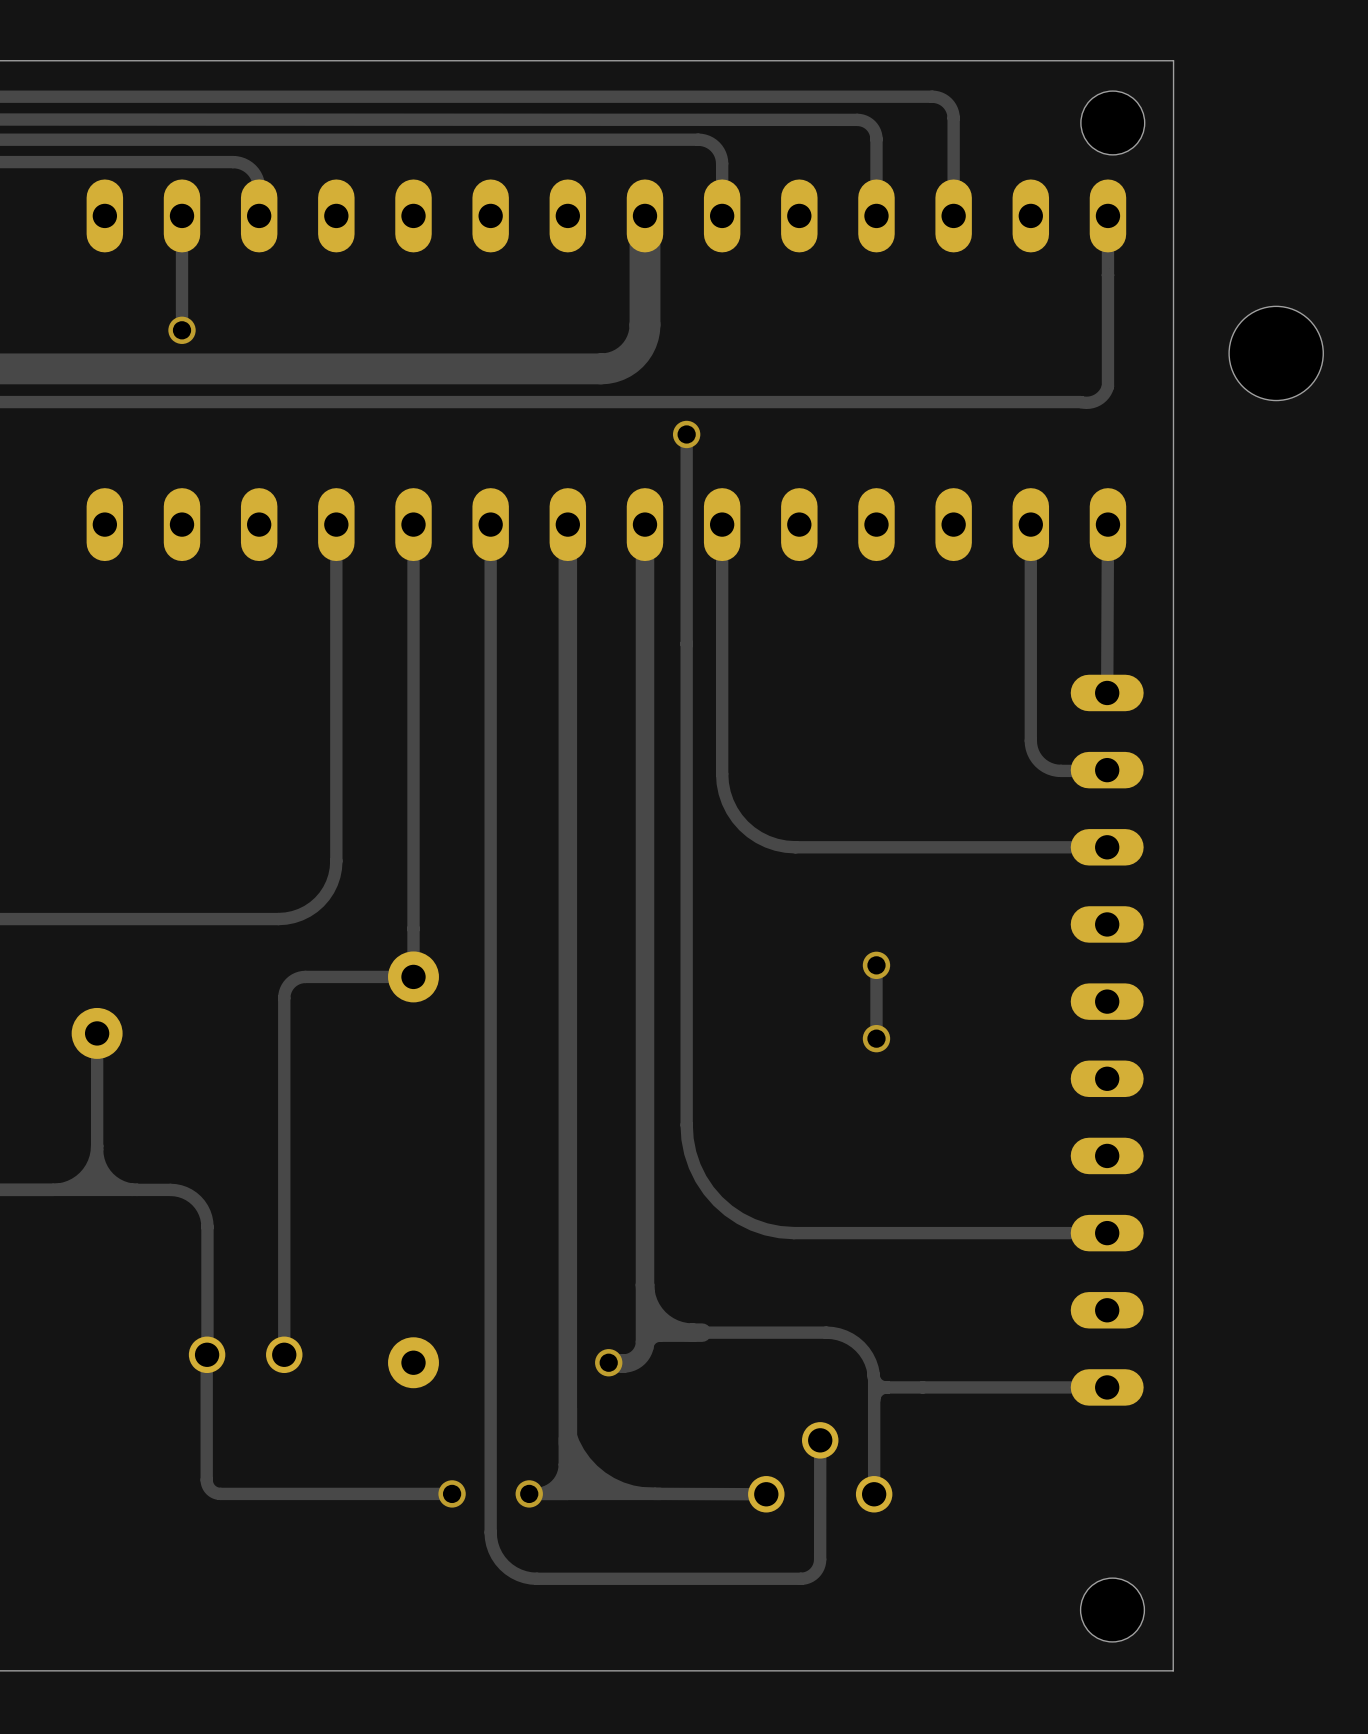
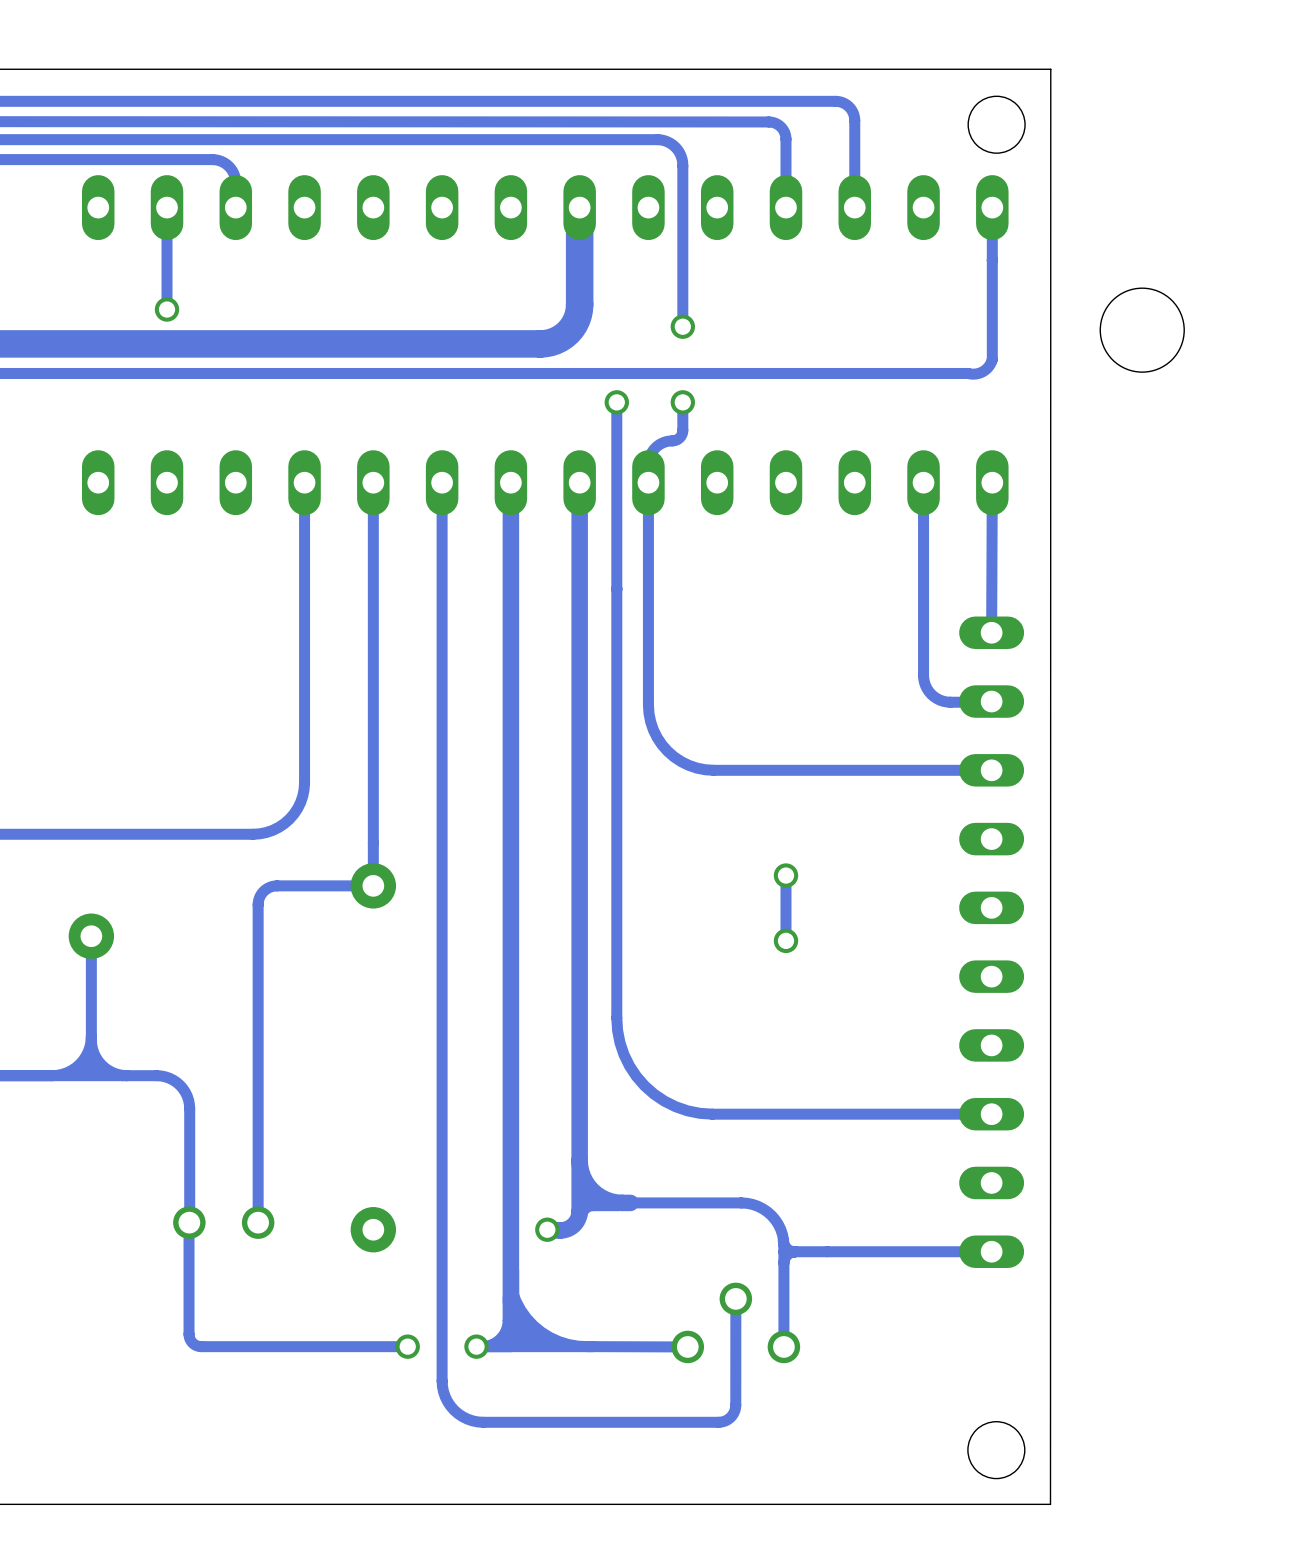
track: (698, 139) (712, 144) (721, 157) (722, 215) -> (627, 139) (664, 140) (675, 147) (682, 159) (682, 326)
via: none -> (682, 326)
track: none -> (682, 402) (682, 434) (677, 439) (663, 442) (653, 450) (648, 461) (648, 482)
via: none -> (682, 402)

